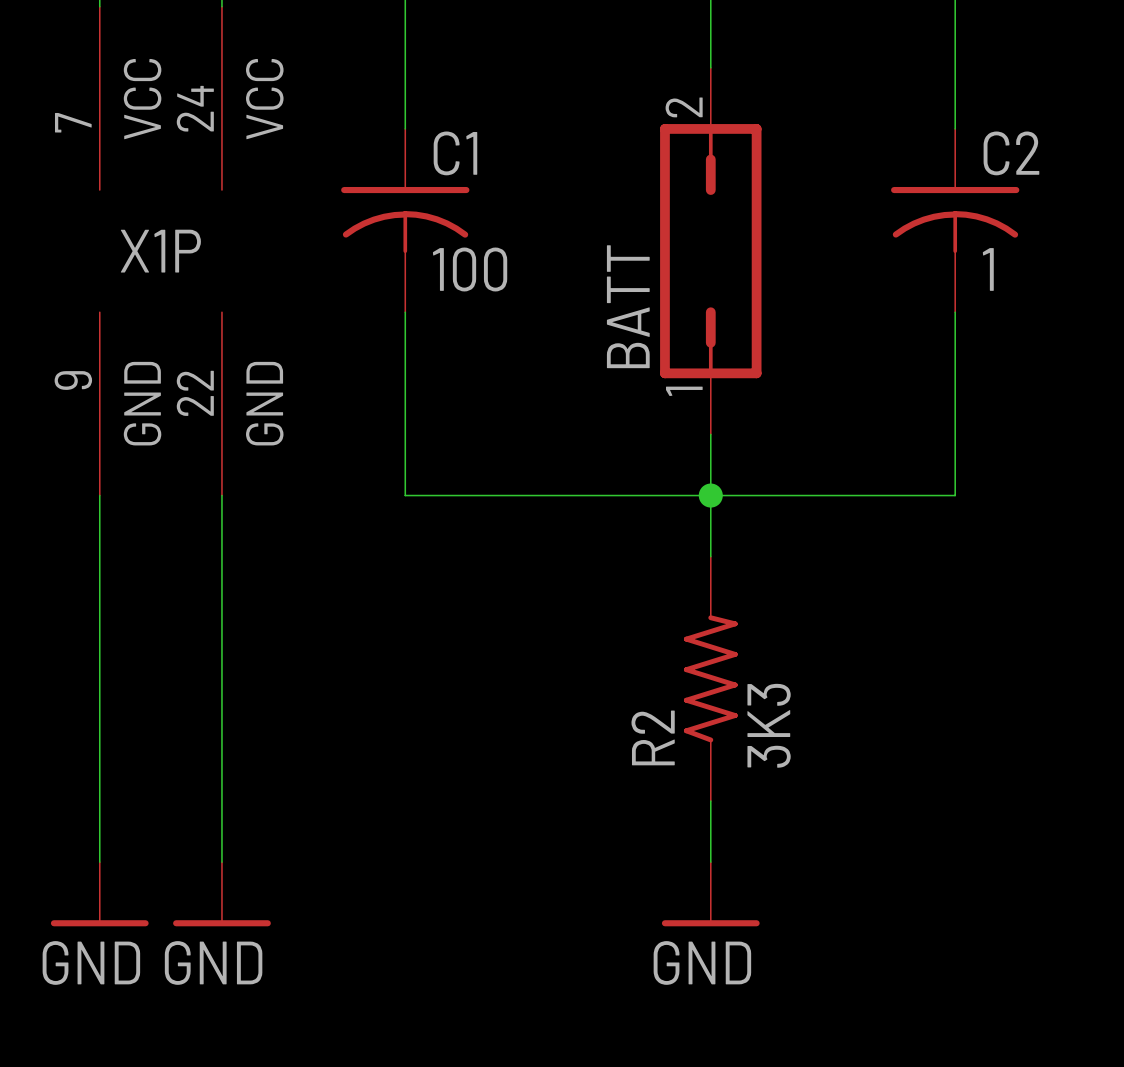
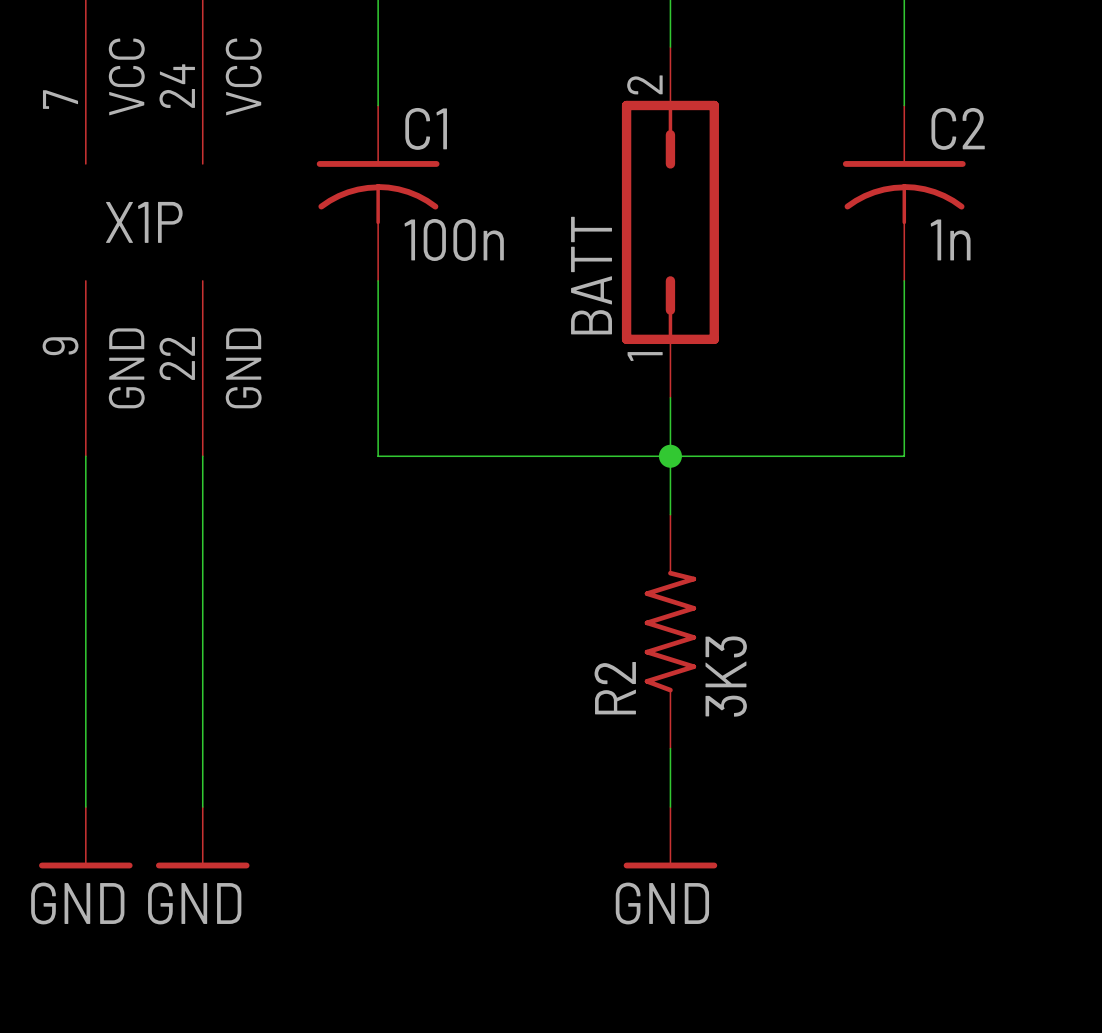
C1 value: 100 (470, 269) -> 100n (454, 239)
C2 value: 1 (988, 269) -> 1n (950, 239)

